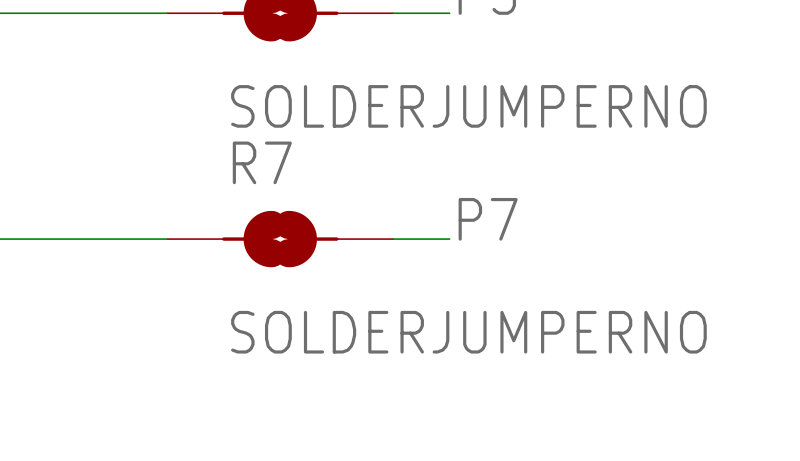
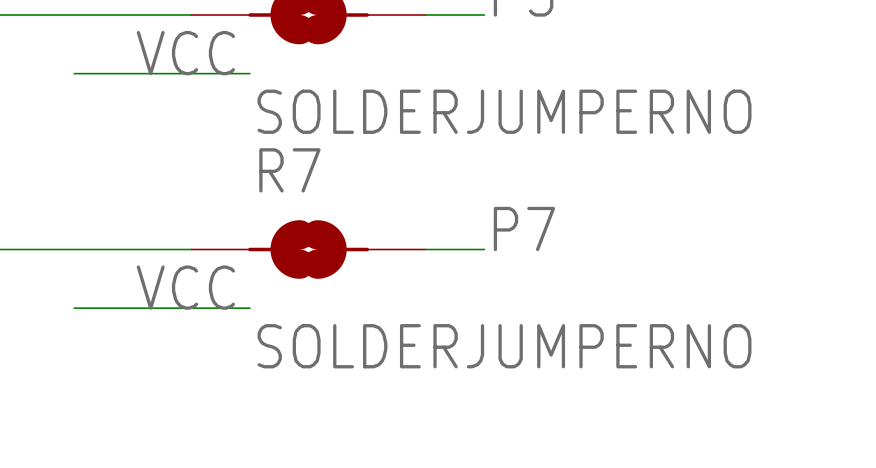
label: none -> VCC (185, 53)
wire: none -> (74, 73) (249, 73)
label: none -> VCC (185, 287)
wire: none -> (74, 308) (249, 308)

